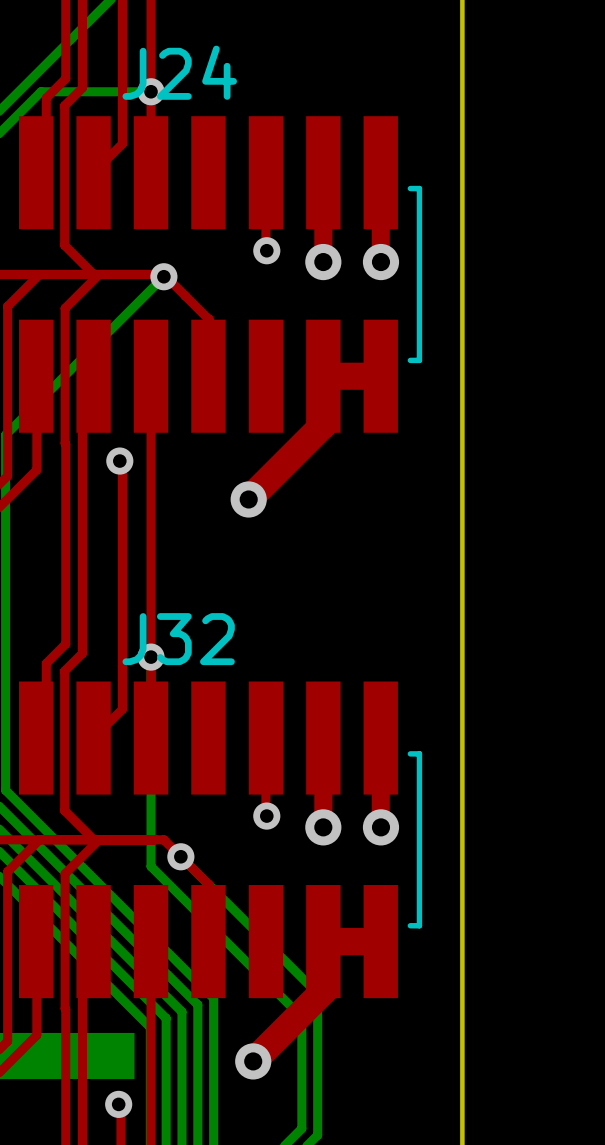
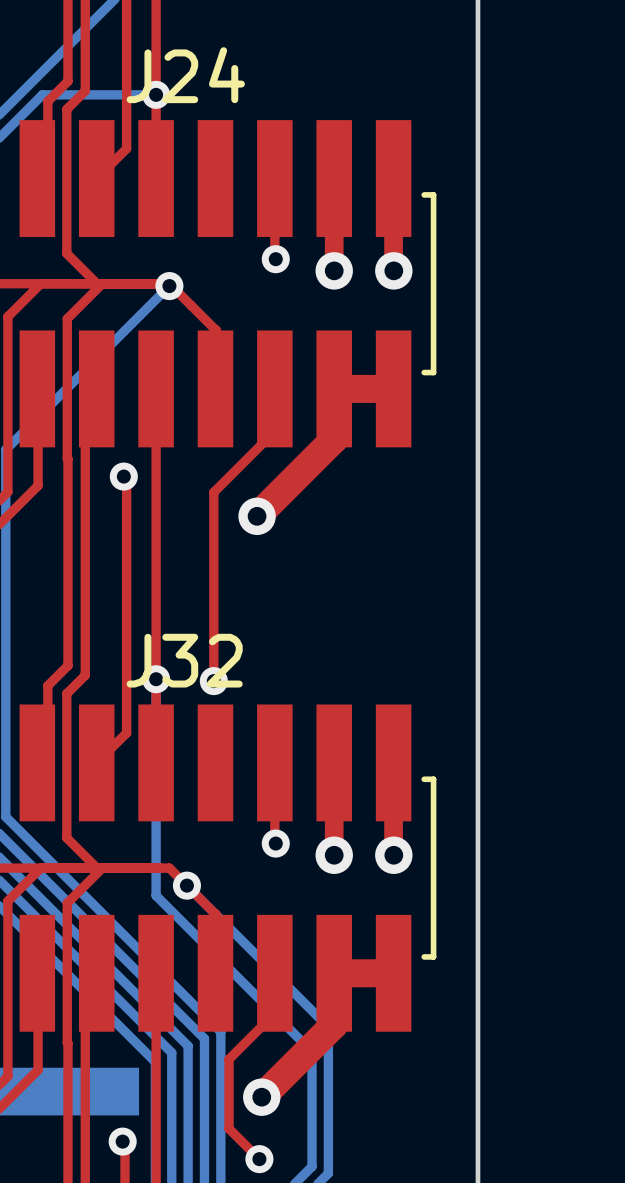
top track: none -> (274, 388) (274, 431) (213, 492) (213, 681)
via: none -> (213, 681)
top track: none -> (274, 973) (274, 1013) (229, 1059) (229, 1128) (259, 1159)
via: none -> (259, 1159)

